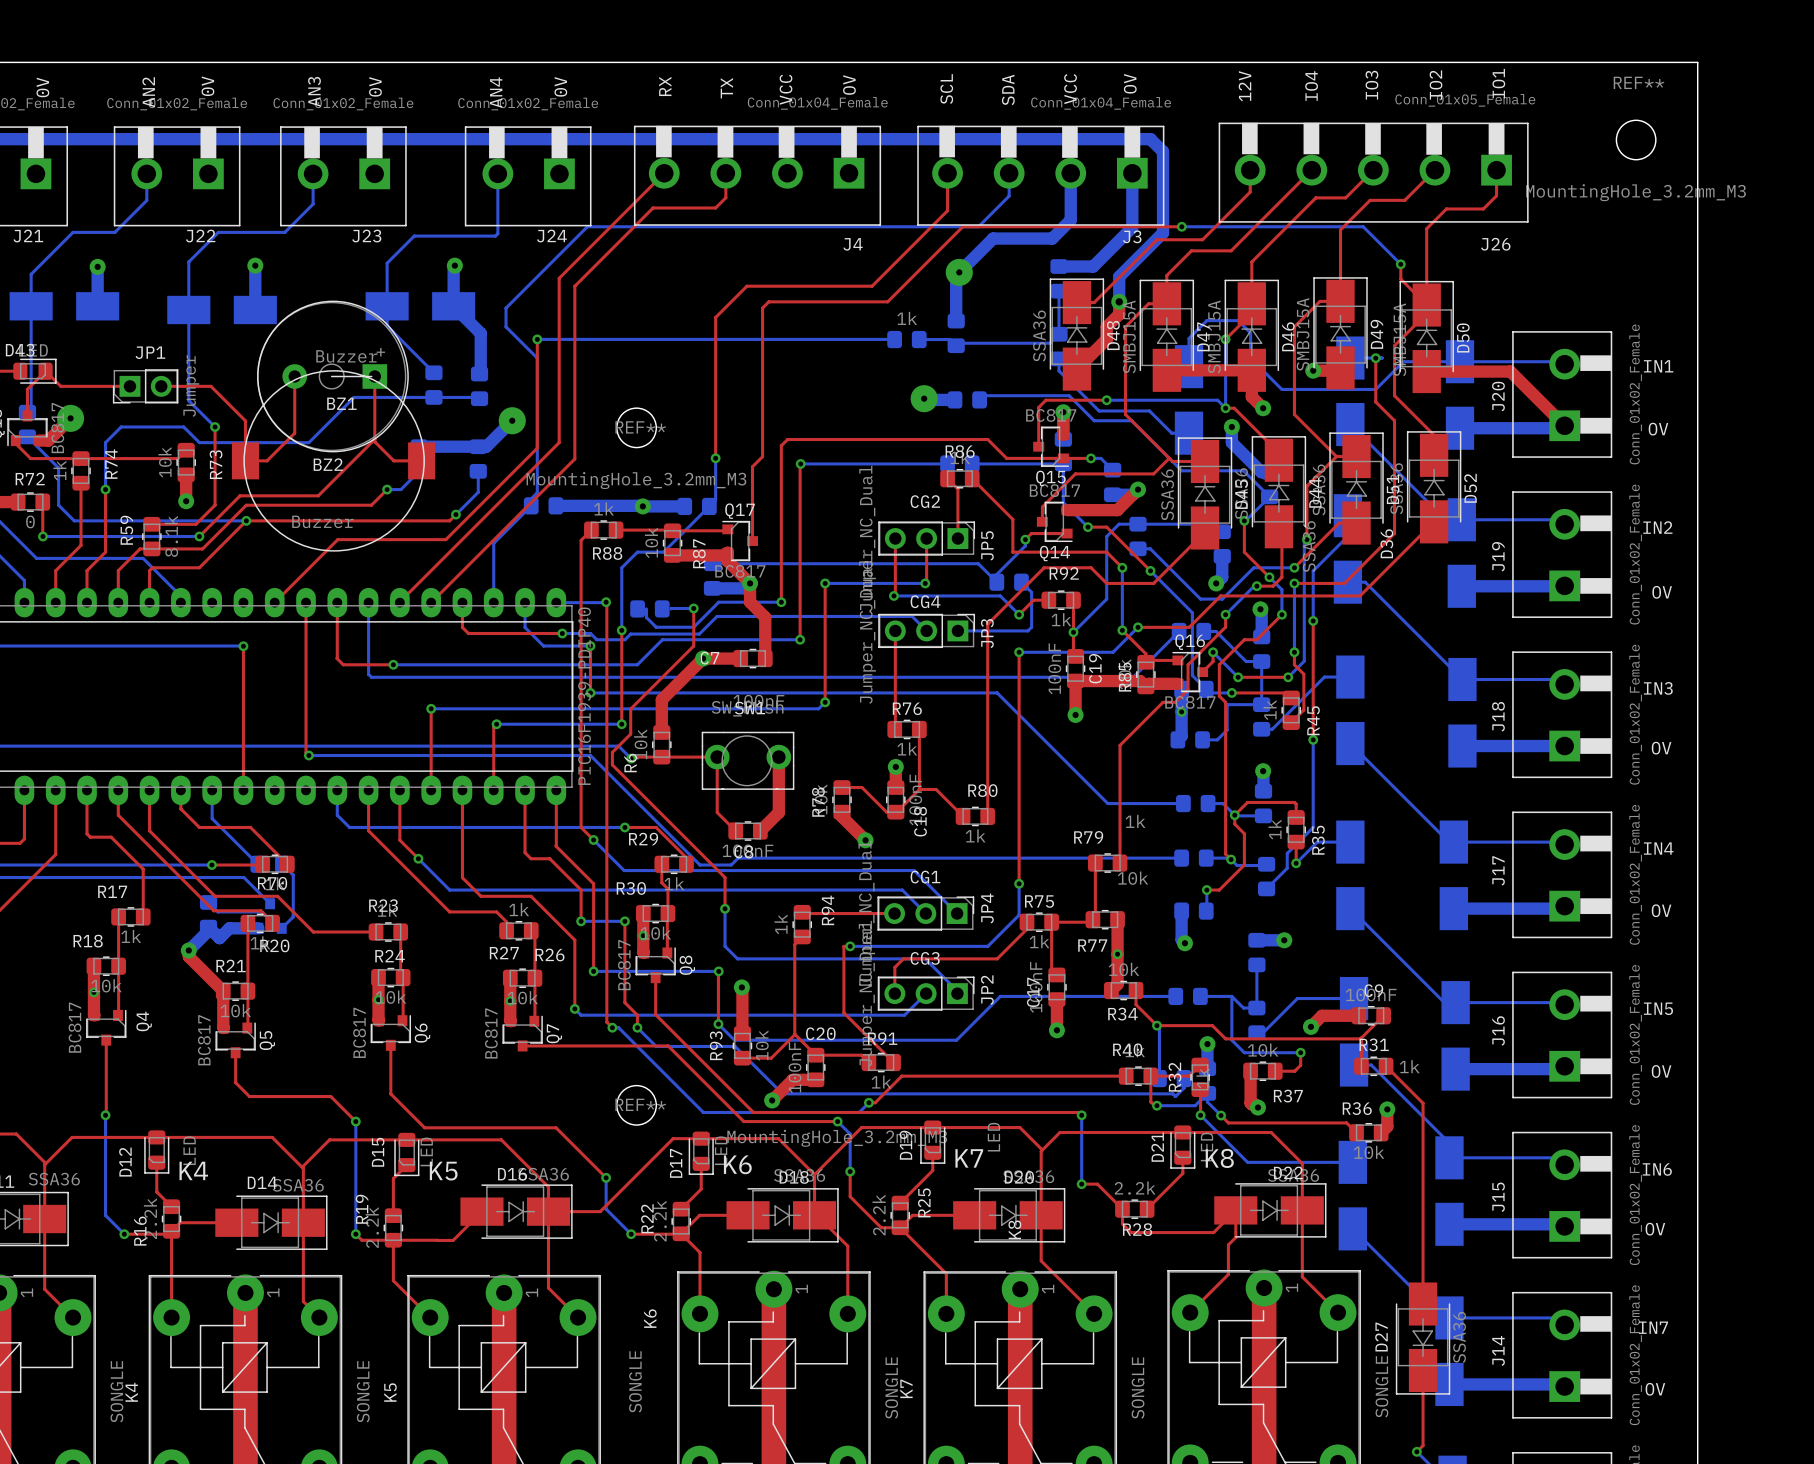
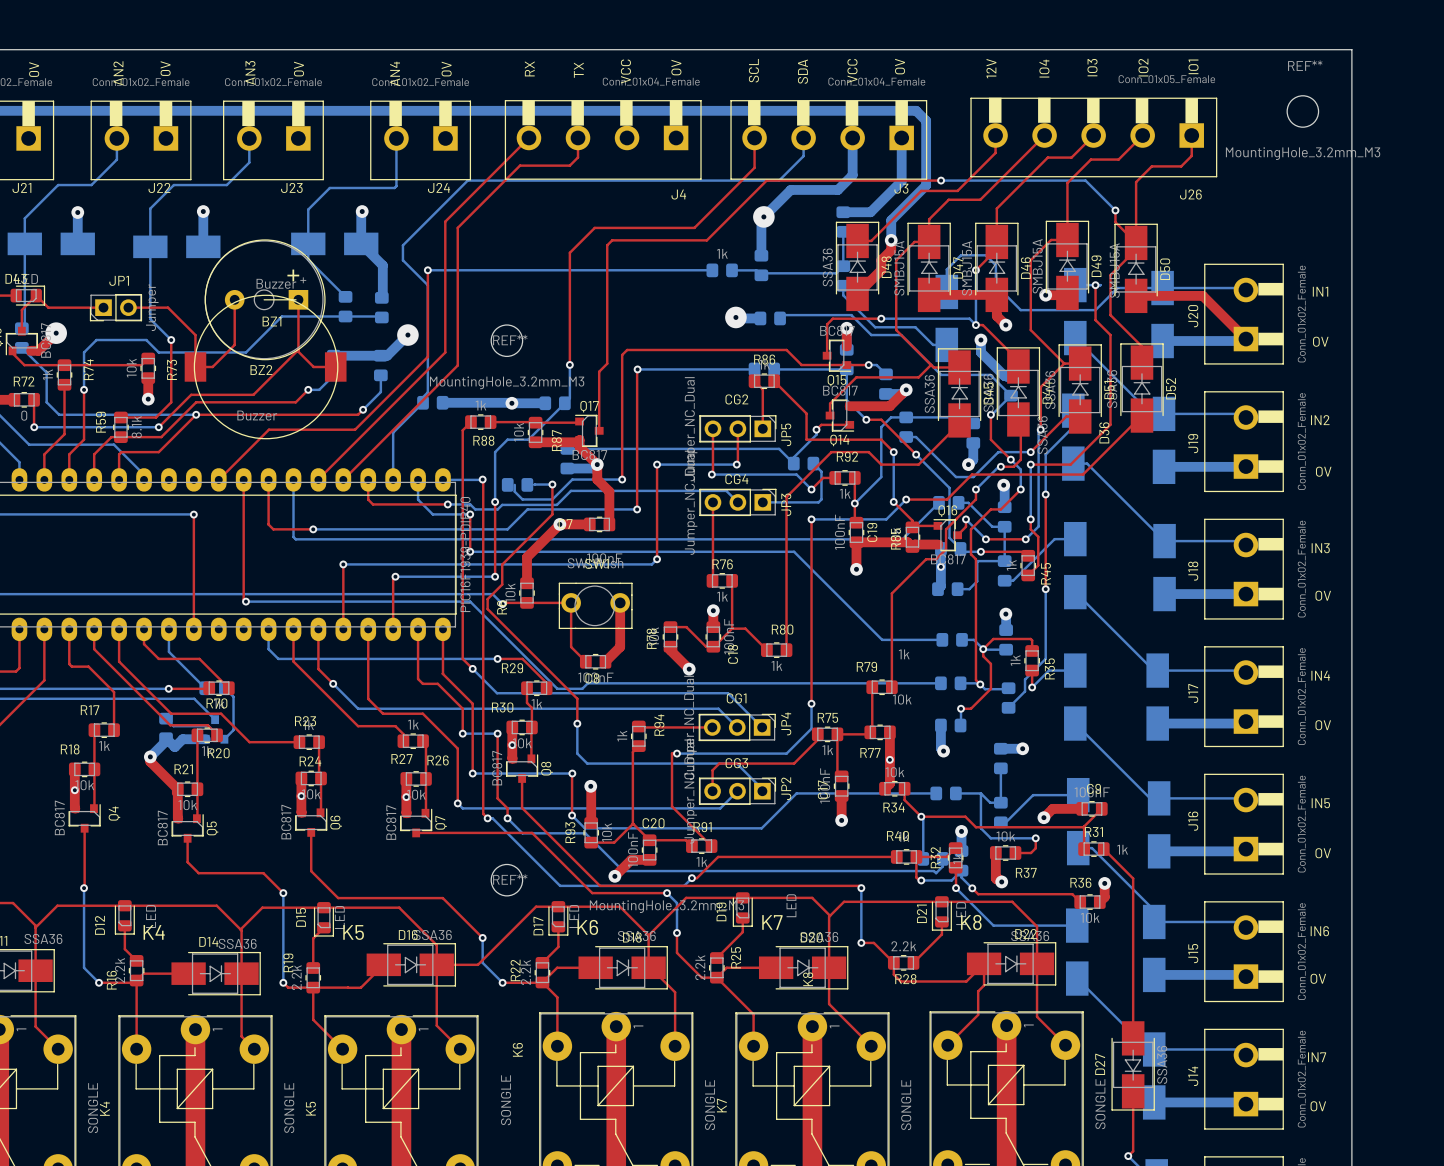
text: none -> + (293, 275)

